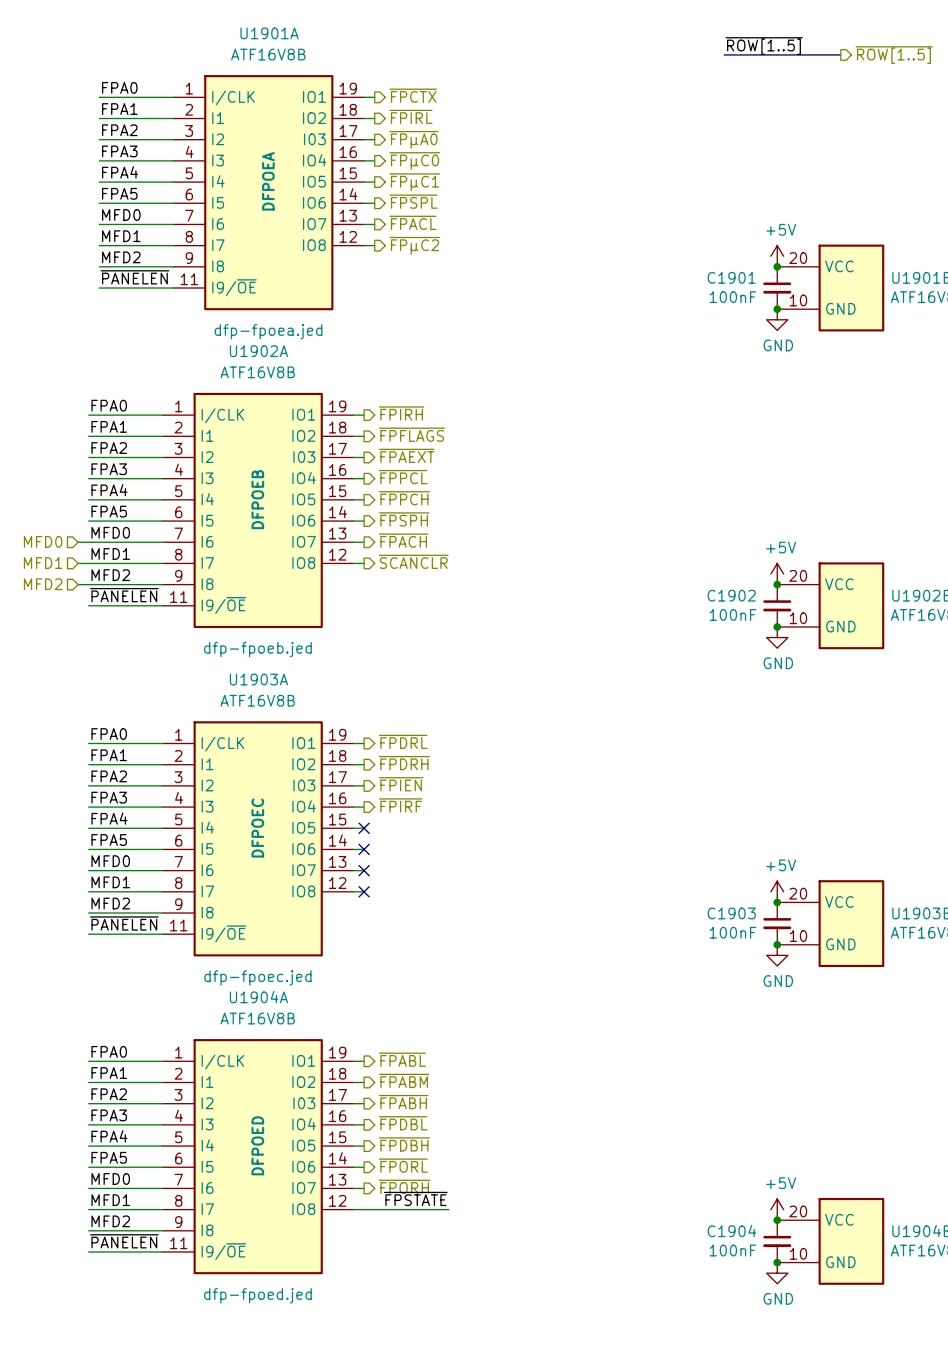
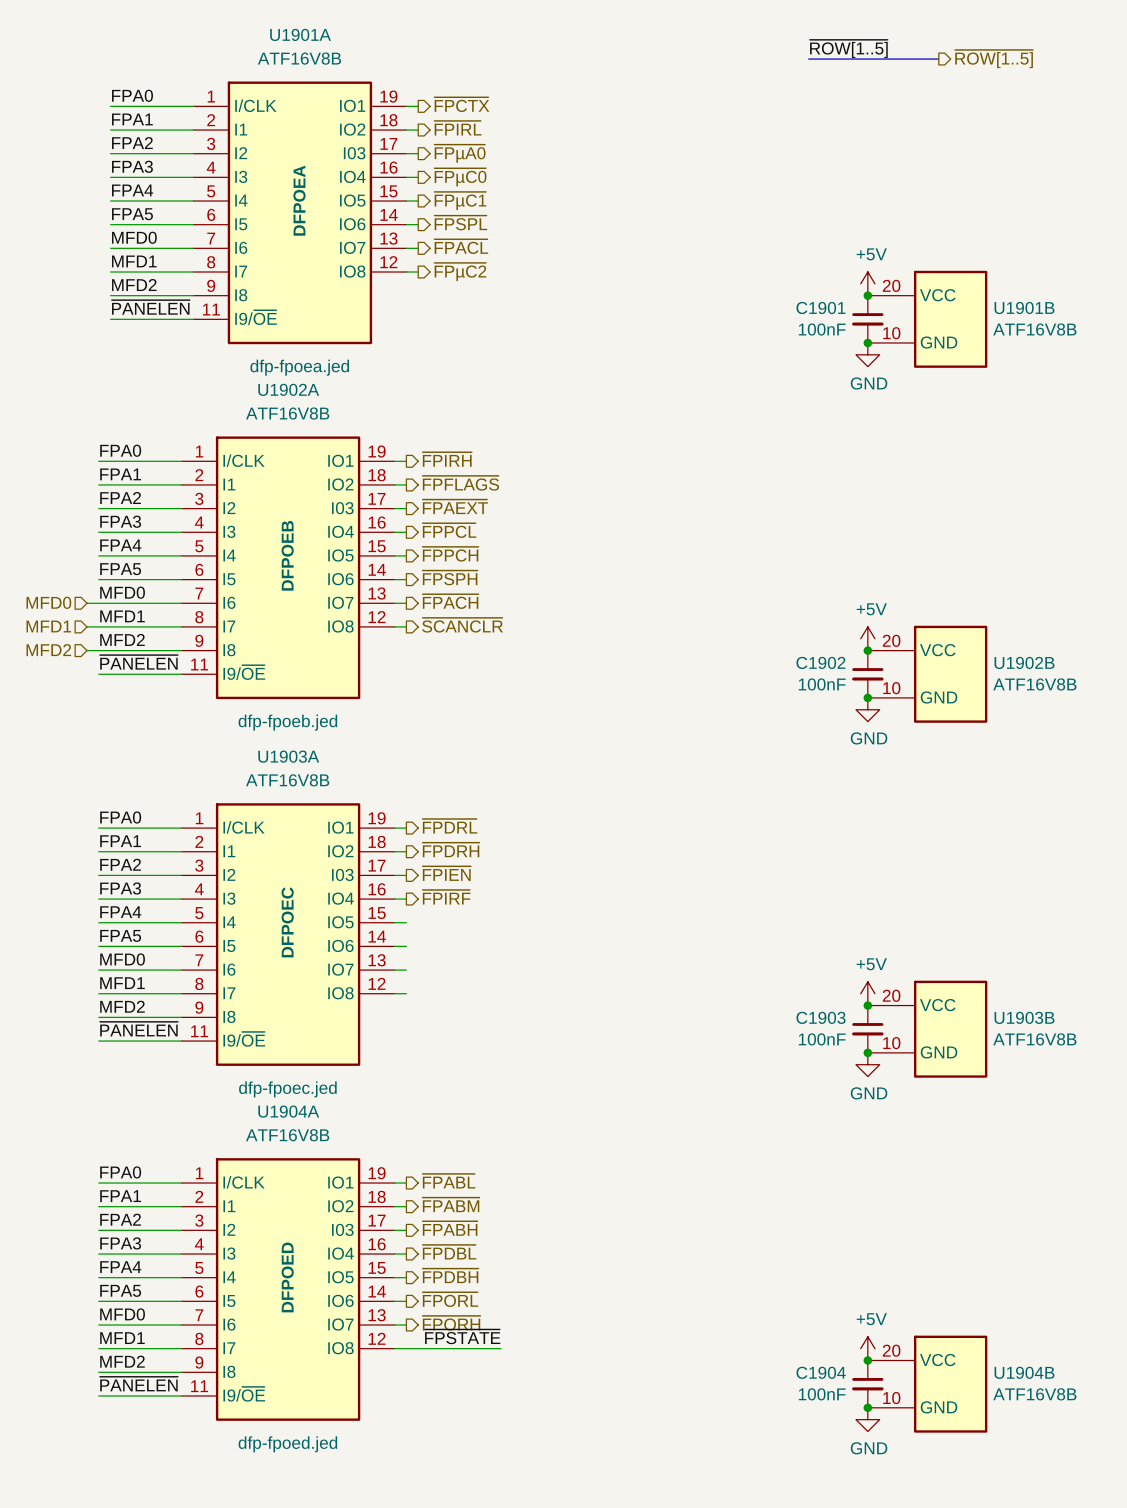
no-connect mark: (364, 828) -> none
no-connect mark: (364, 849) -> none
no-connect mark: (364, 870) -> none
no-connect mark: (364, 891) -> none

